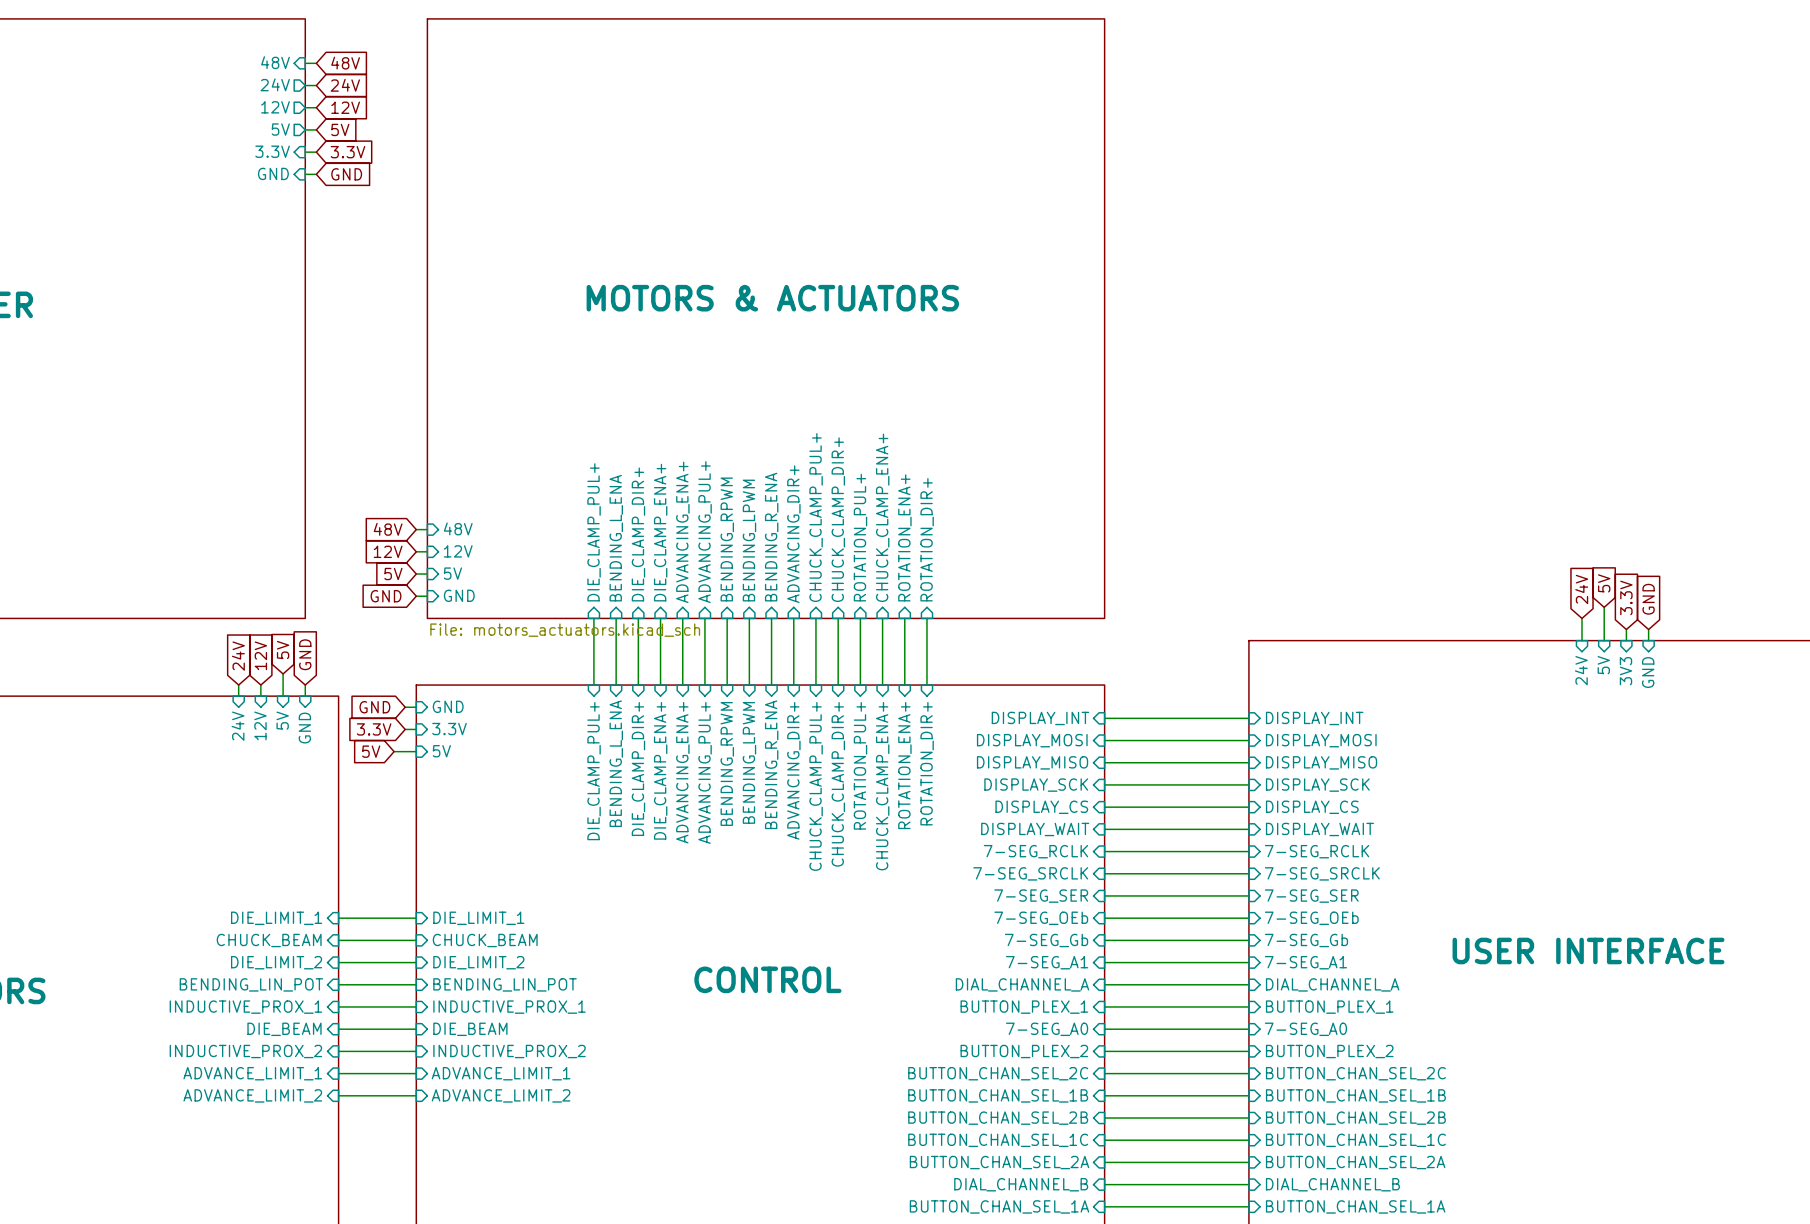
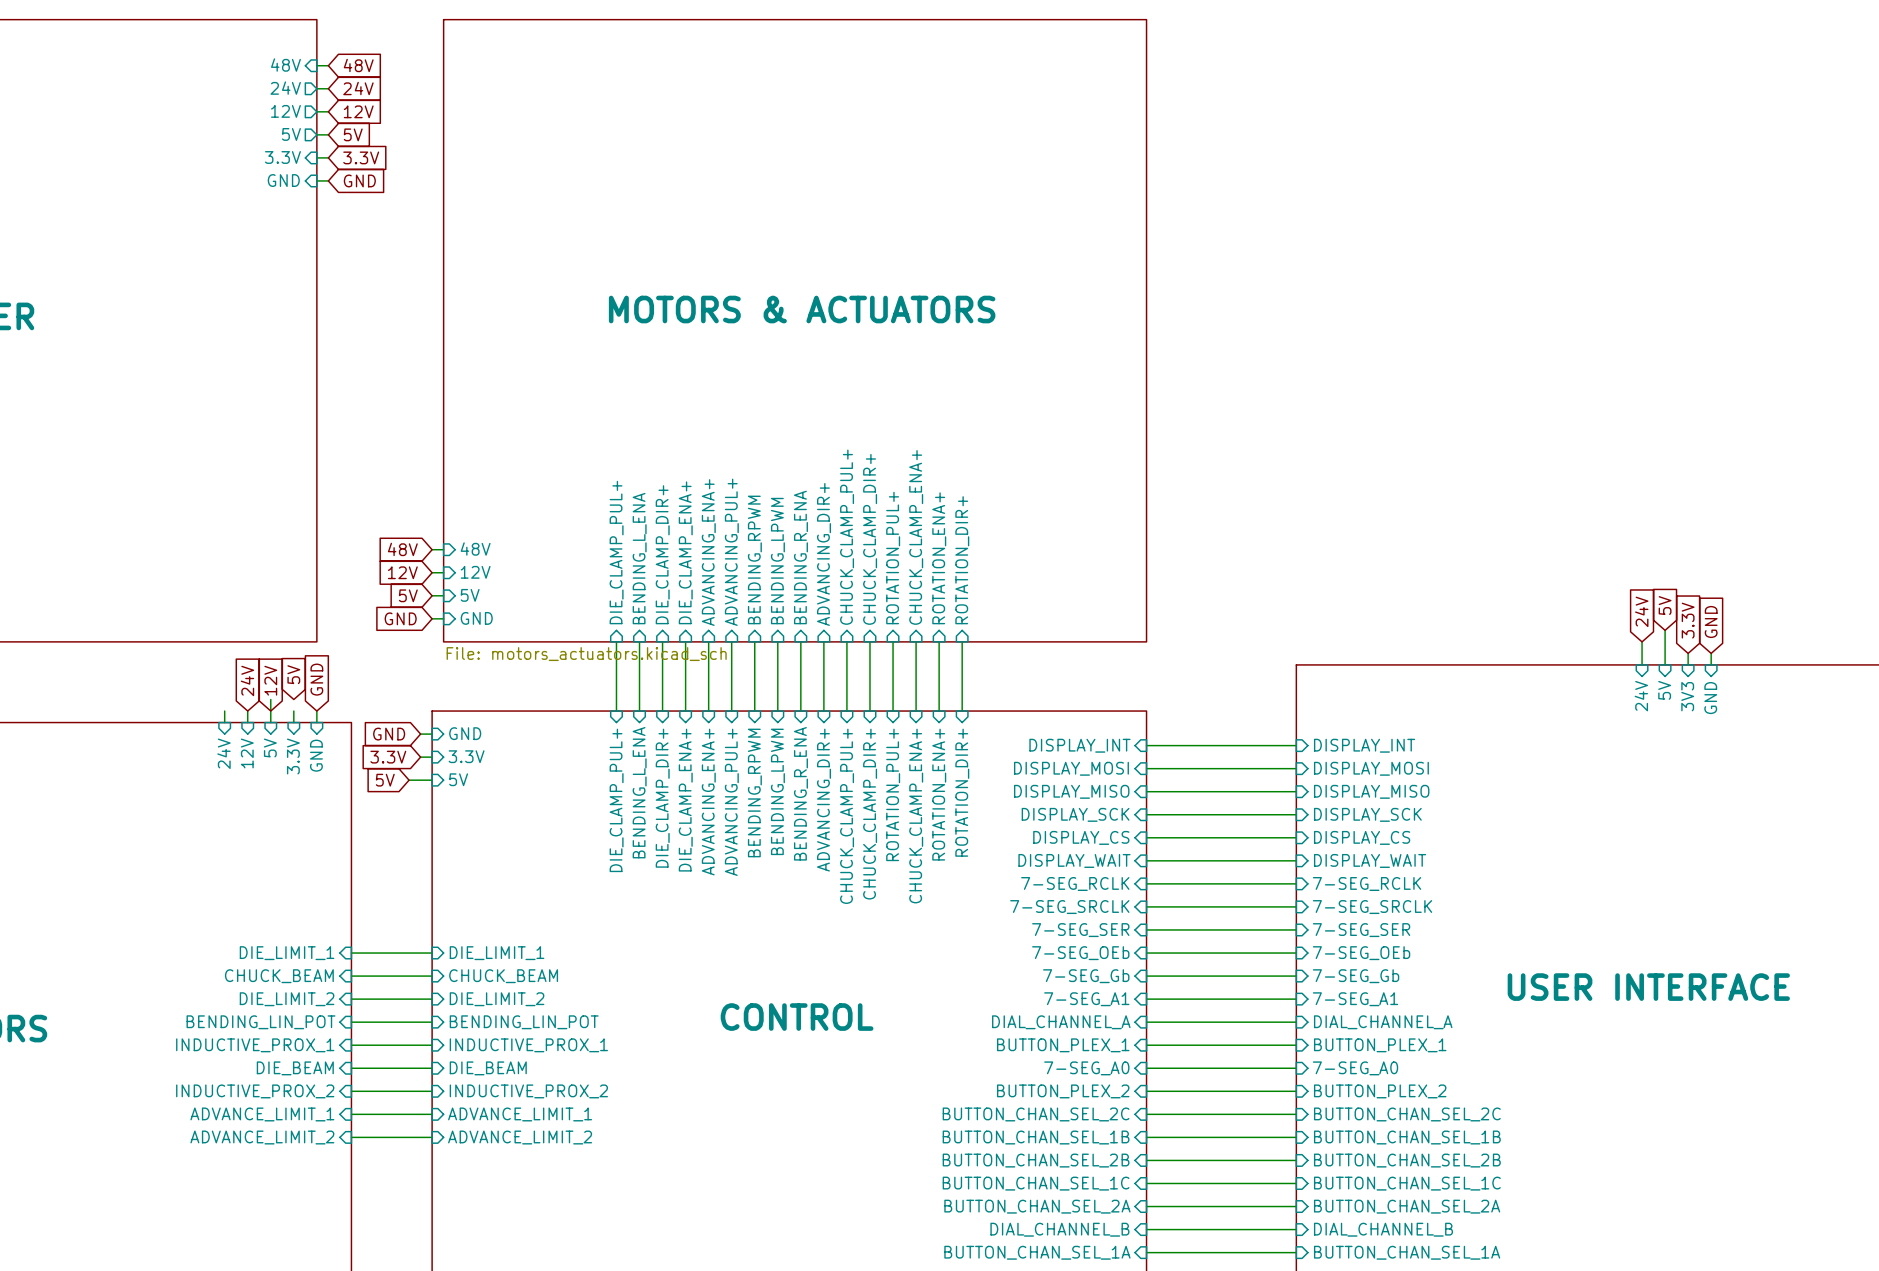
wire: (283, 673) (283, 685) -> (270, 699) (270, 711)
wire: none -> (224, 711) (224, 722)
sheet pin: 5V (282, 720) -> 3.3V (293, 756)
sheet pin: 12V (260, 725) -> 5V (270, 747)
sheet pin: none -> 24V (223, 753)
sheet pin: 24V (237, 726) -> 12V (247, 753)

